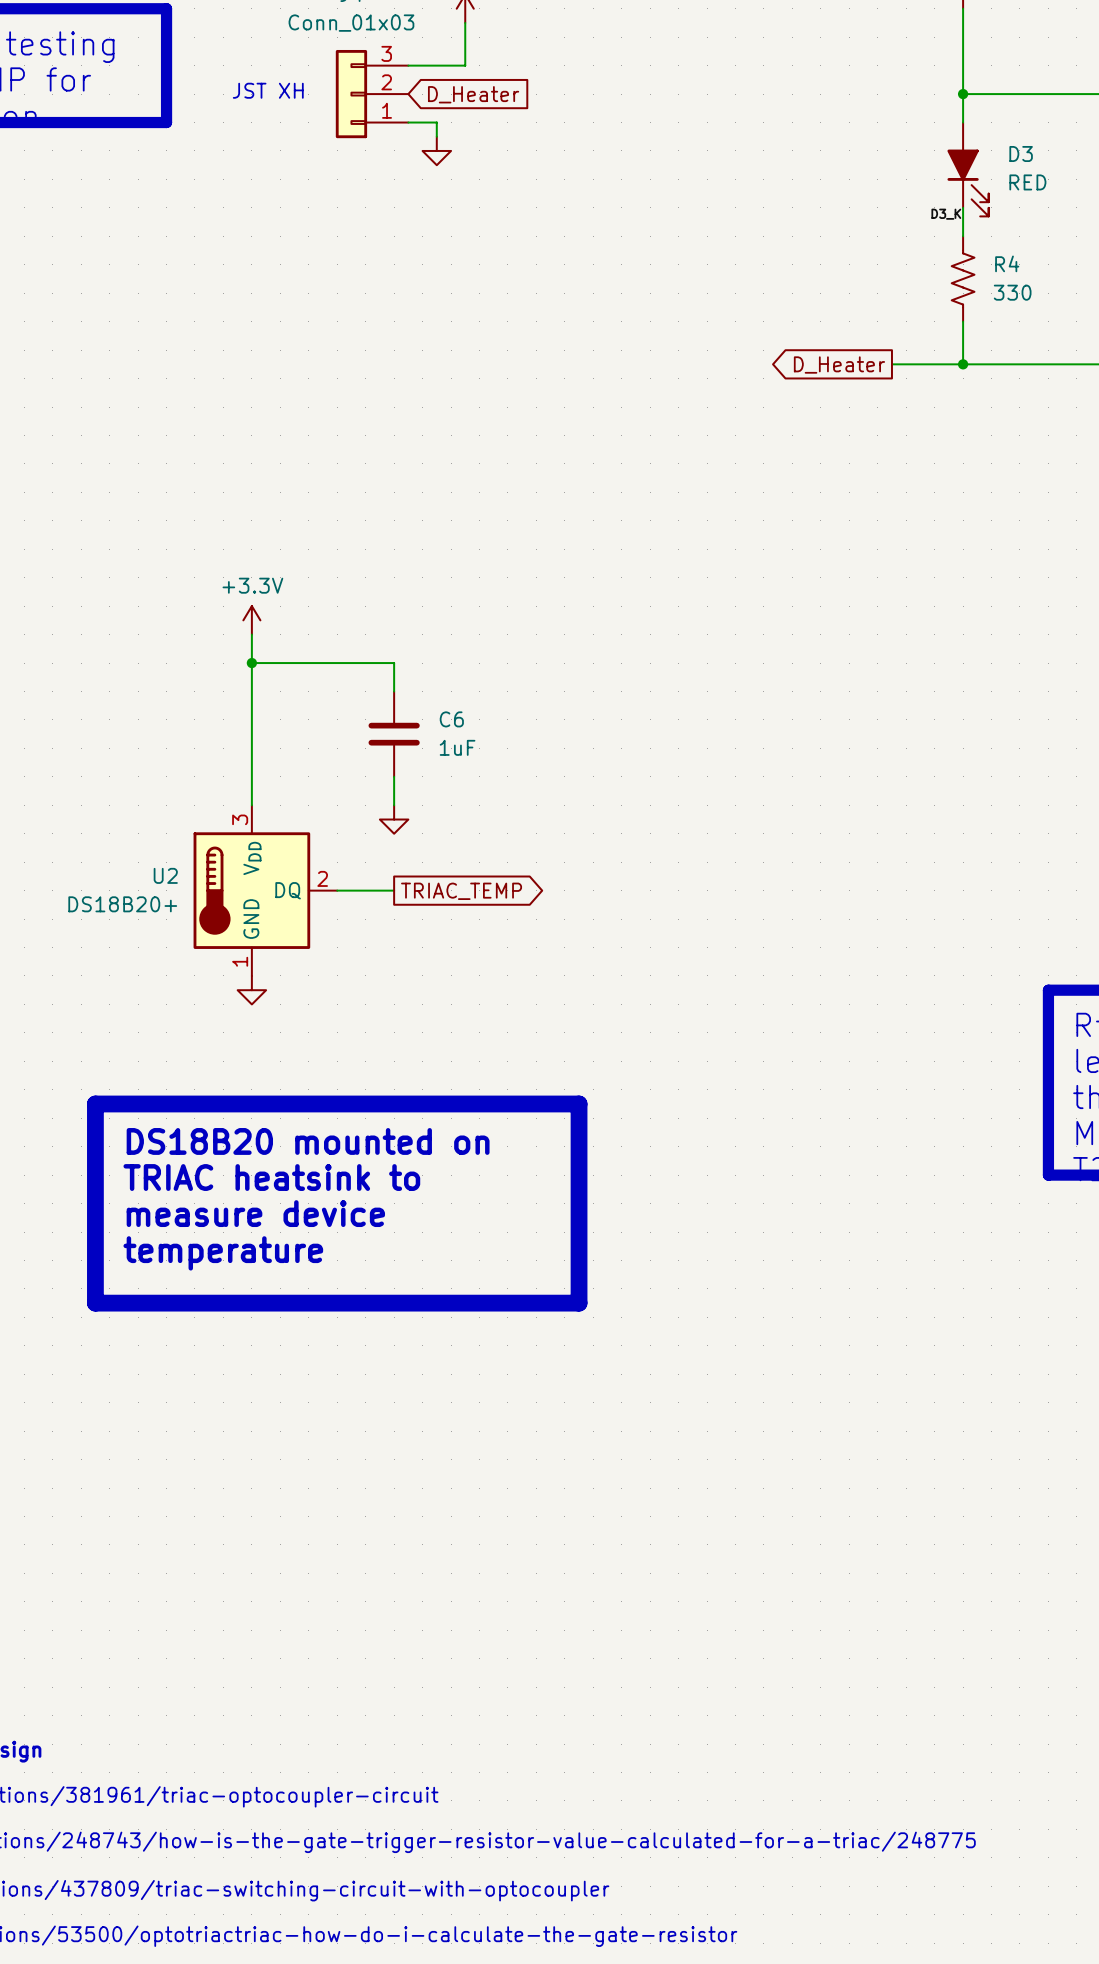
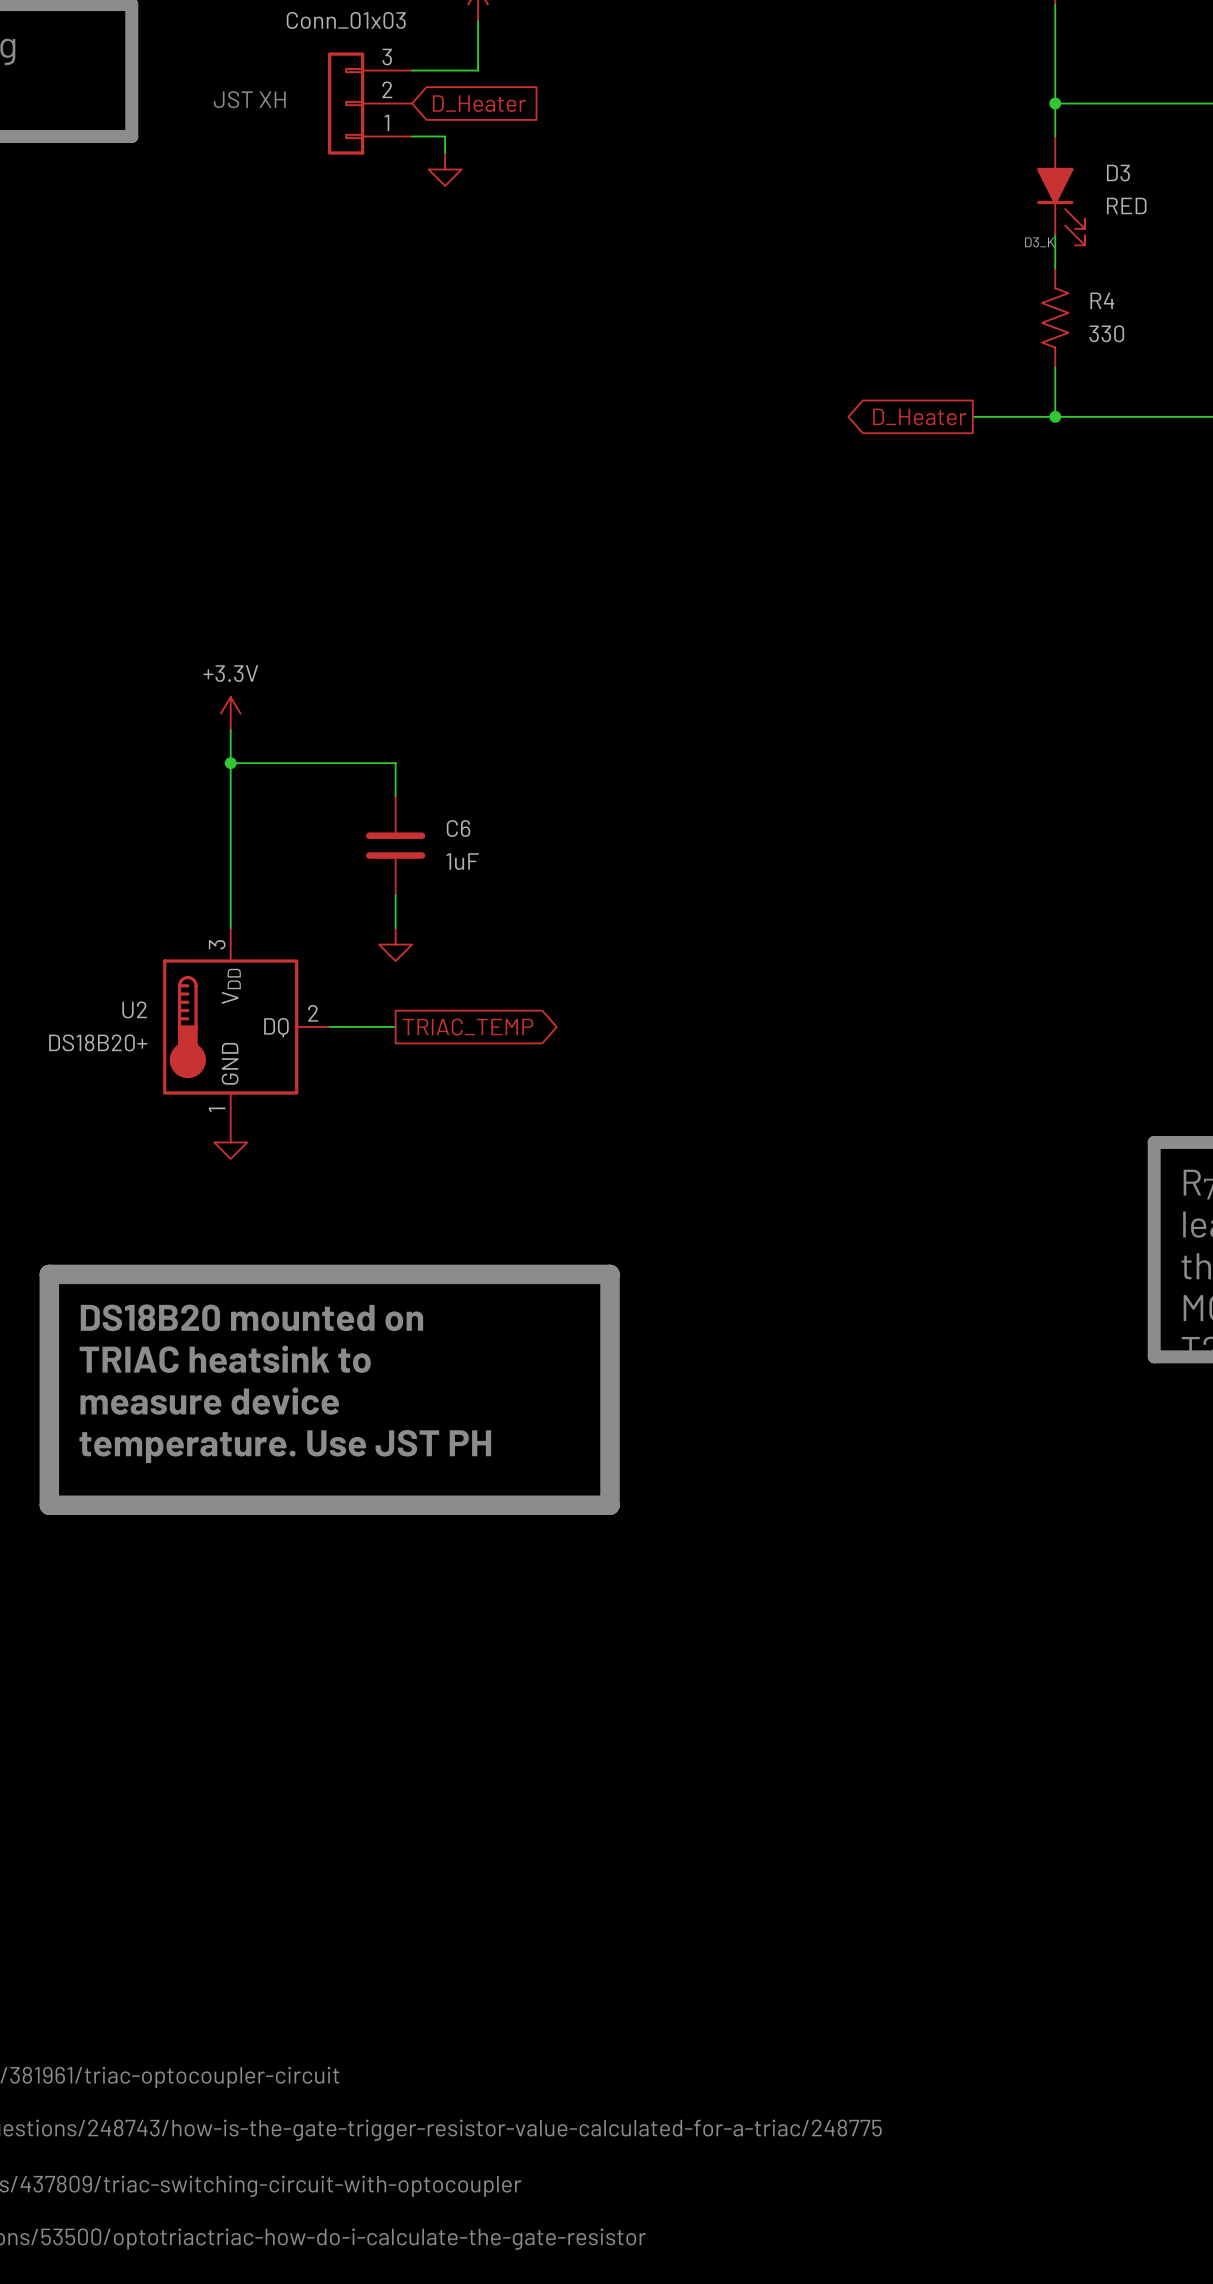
text: temperature (223, 1253) -> temperature. Use JST PH (285, 1446)

